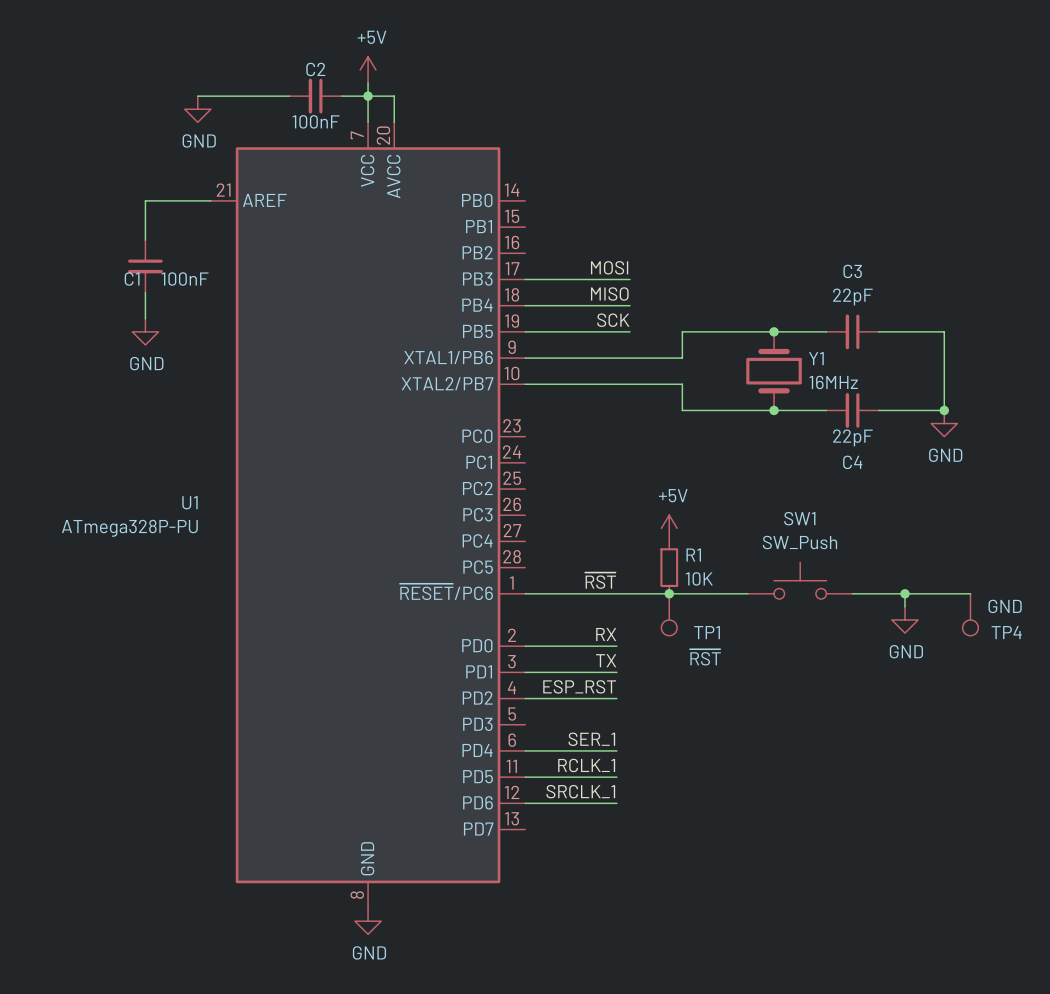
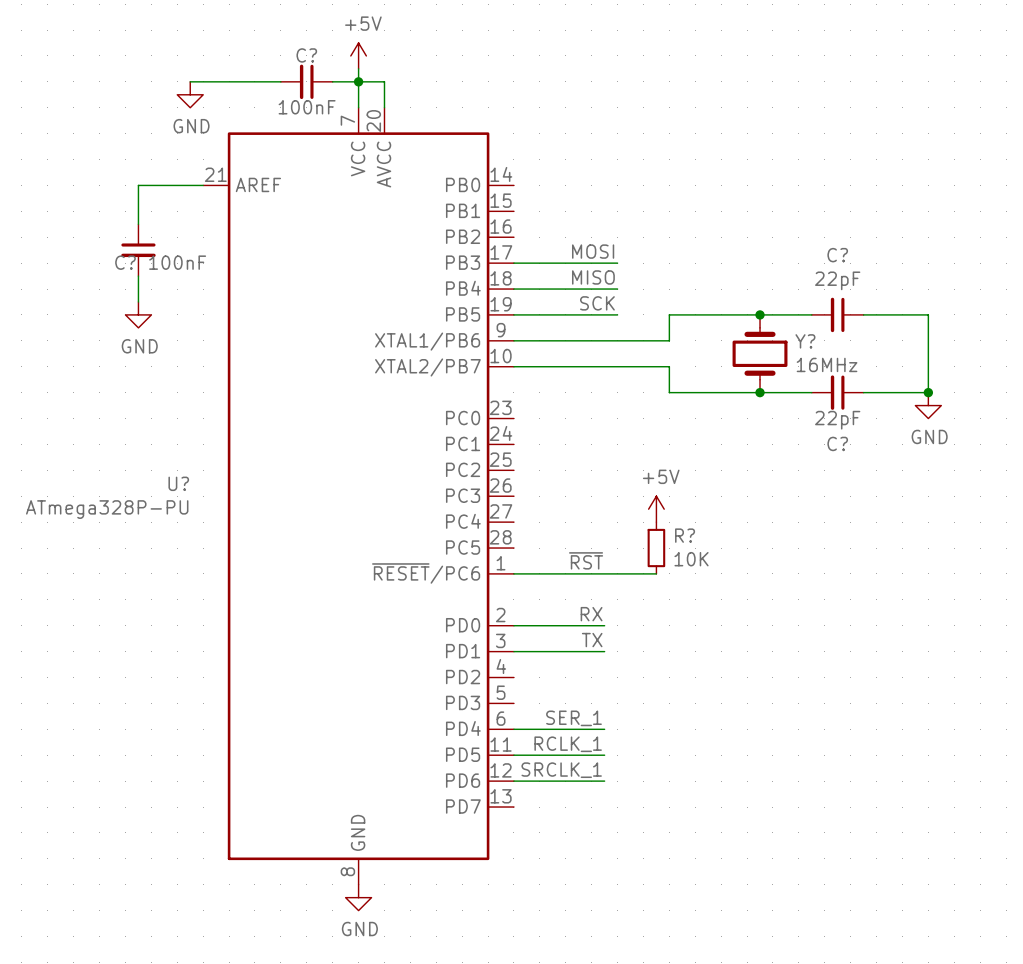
C2 name: C2 (315, 69) -> C? (306, 55)
C3 name: C3 (852, 271) -> C? (837, 255)
C1 name: C1 (132, 279) -> C? (125, 262)
Y1 name: Y1 (816, 358) -> Y? (805, 341)
C4 name: C4 (852, 462) -> C? (837, 443)
U1 name: U1 (189, 502) -> U? (178, 483)
R1 name: R1 (693, 555) -> R? (685, 535)
SW1: SW_Push (800, 580) -> none
wire: (669, 593) (747, 593) -> none
junction: (669, 593) -> none
wire: (852, 593) (970, 593) -> none
wire: (905, 593) (905, 606) -> none
junction: (905, 593) -> none
TP1: ~{RST} (669, 614) -> none
TP4: GND (970, 614) -> none
power symbol: GND (905, 619) -> none
label: ESP_RST (579, 686) -> none
wire: (525, 698) (616, 698) -> none

